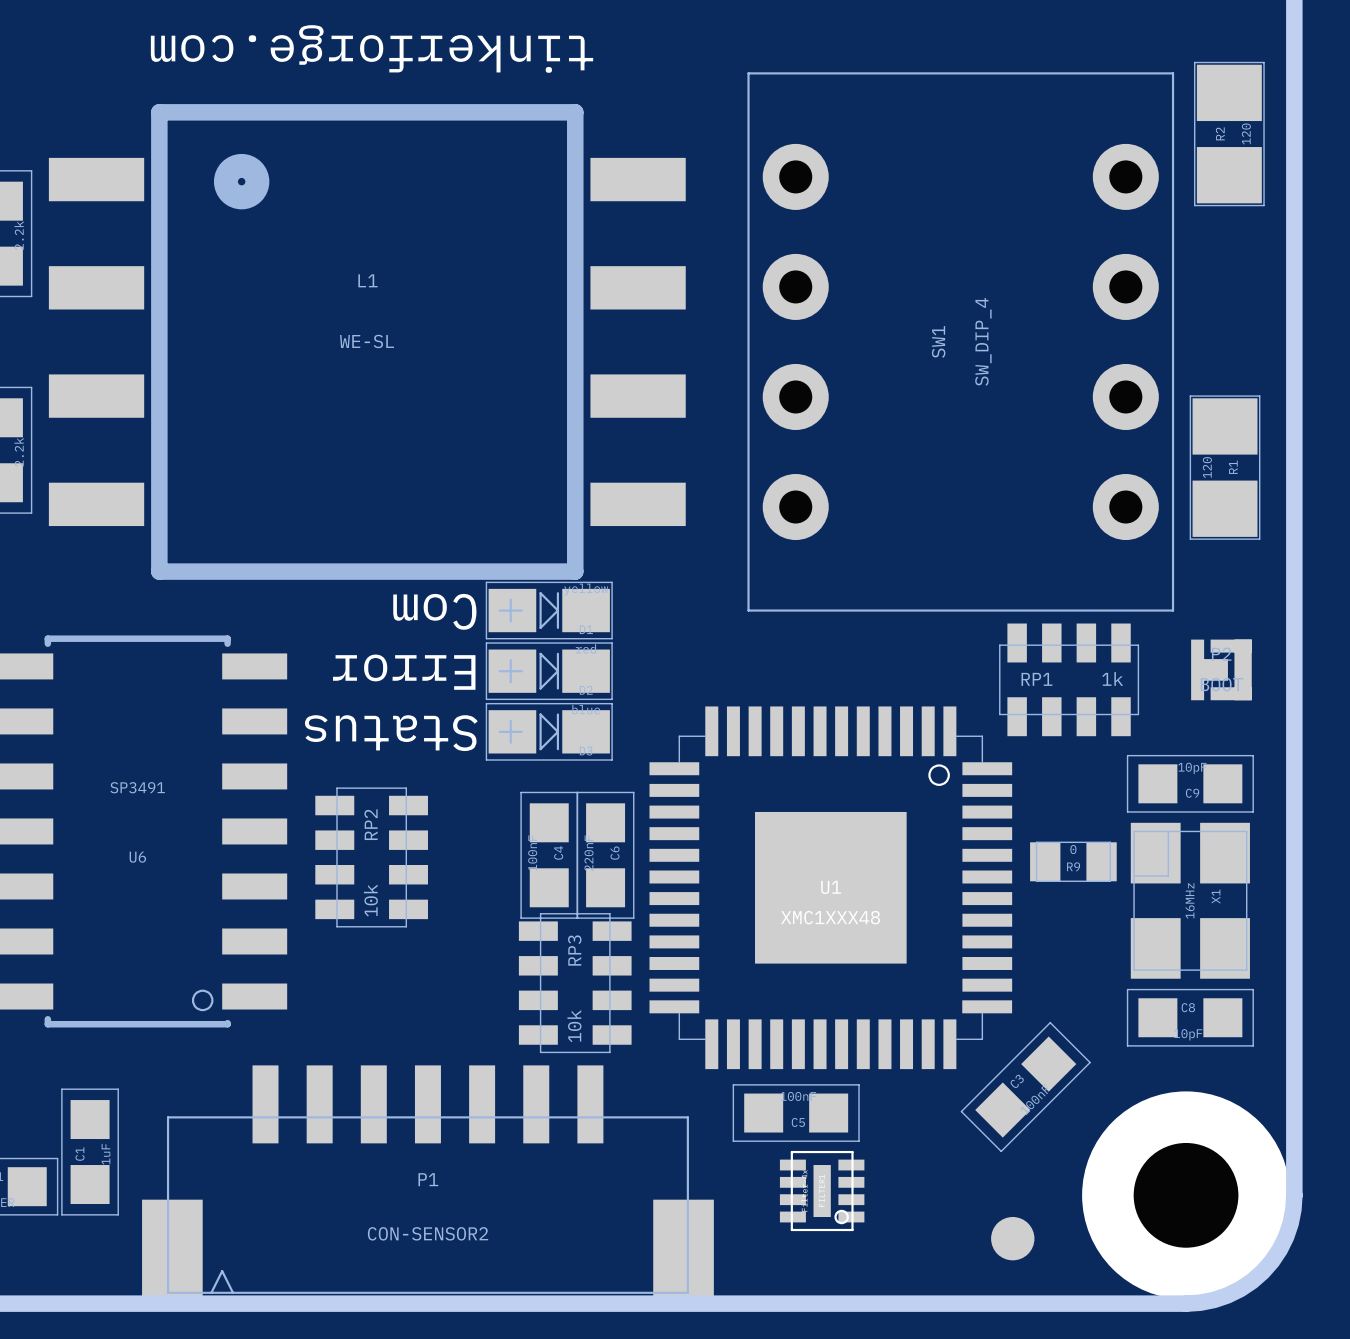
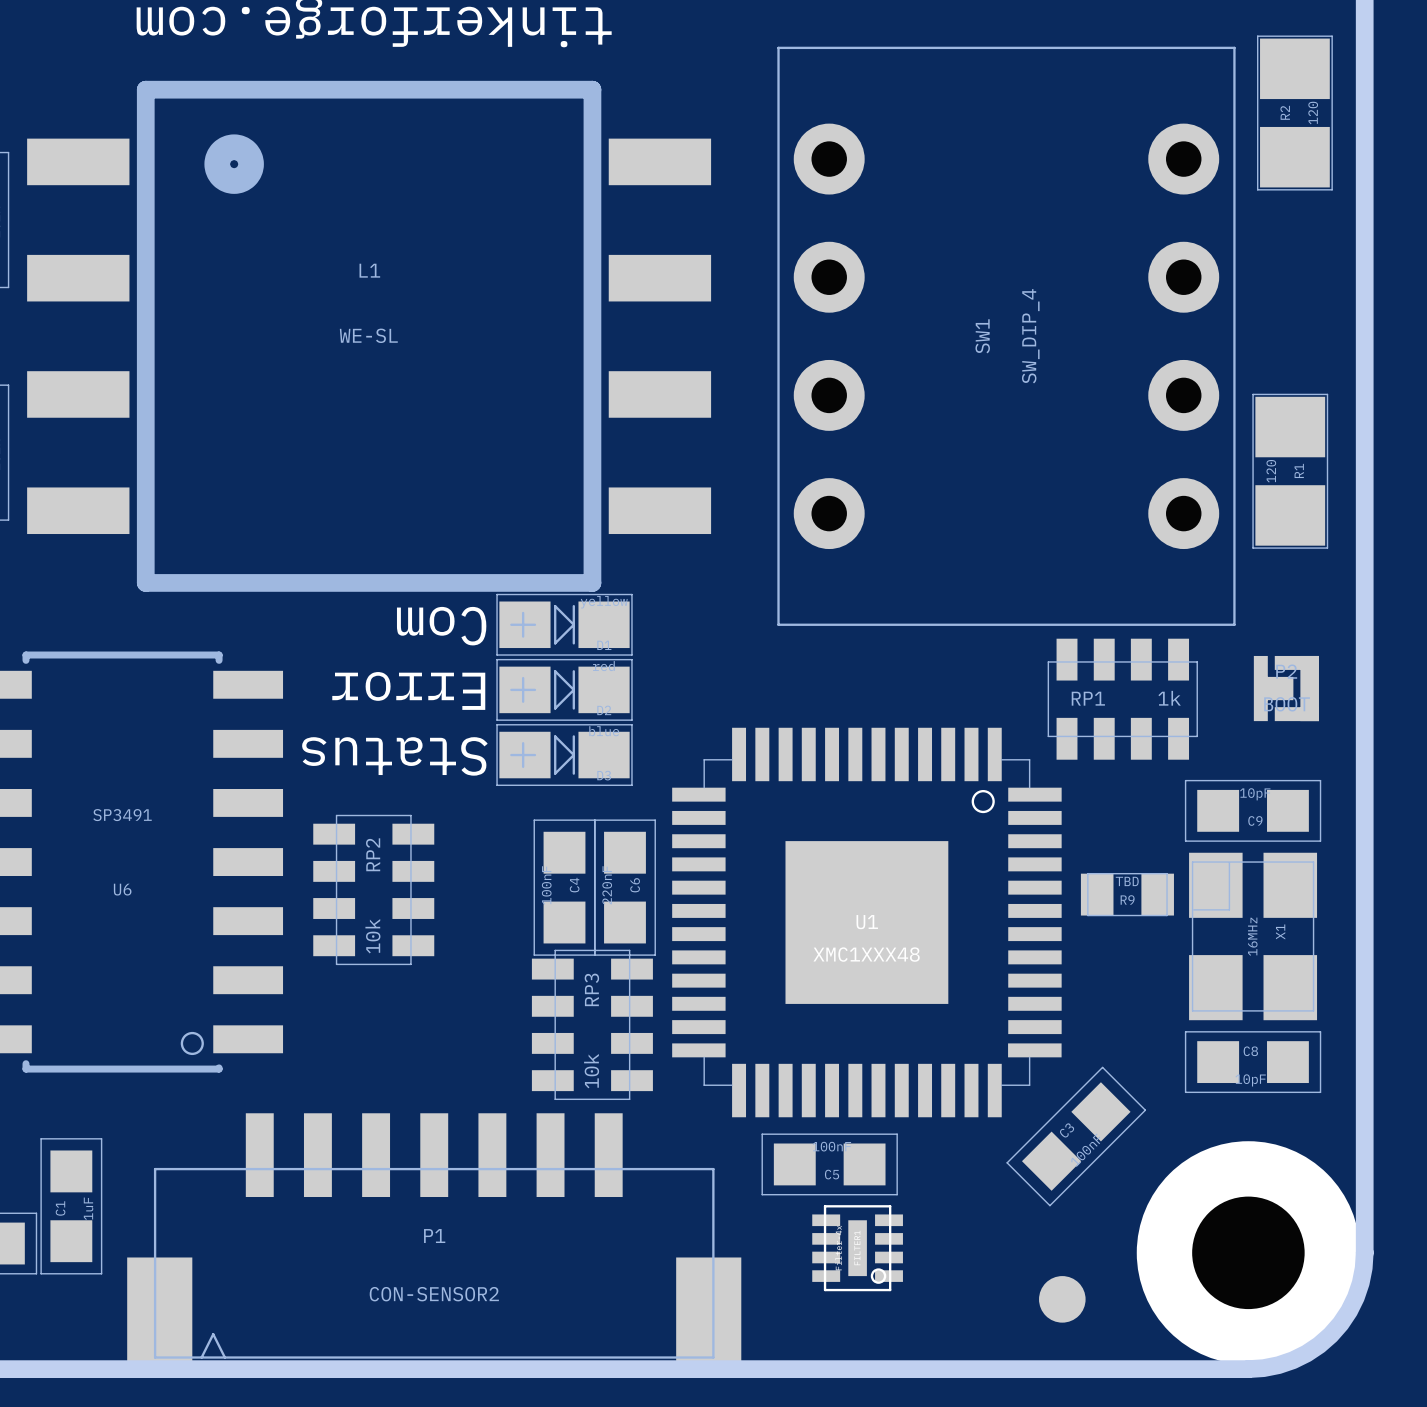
R9 value: 0 (1073, 849) -> TBD (1127, 881)

